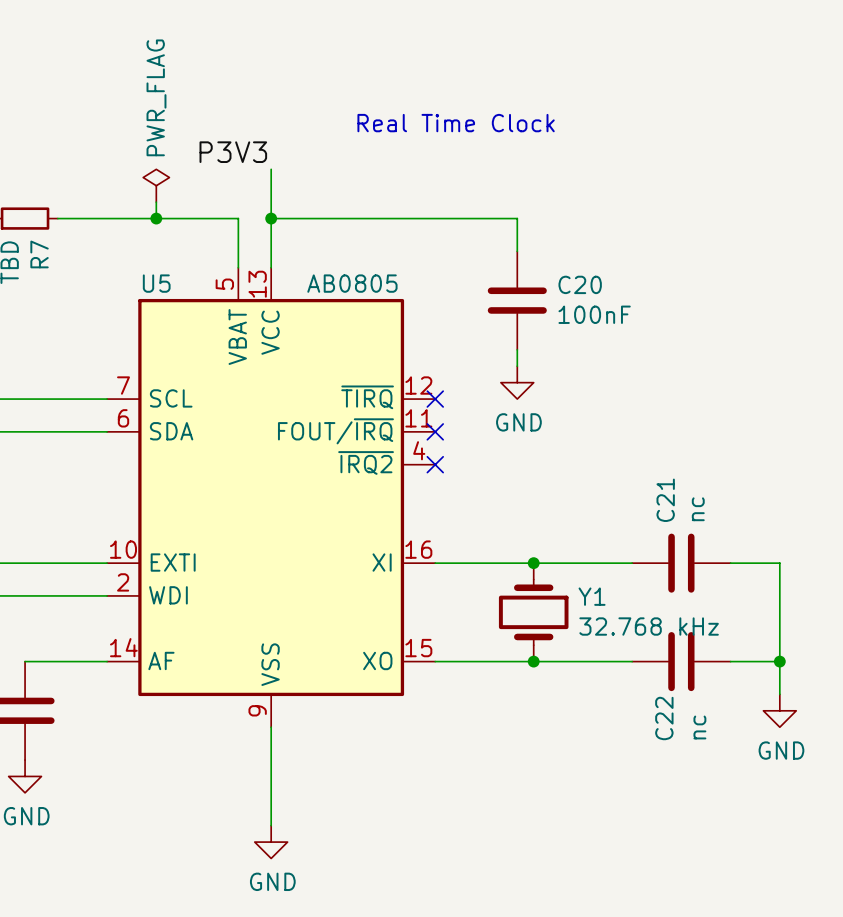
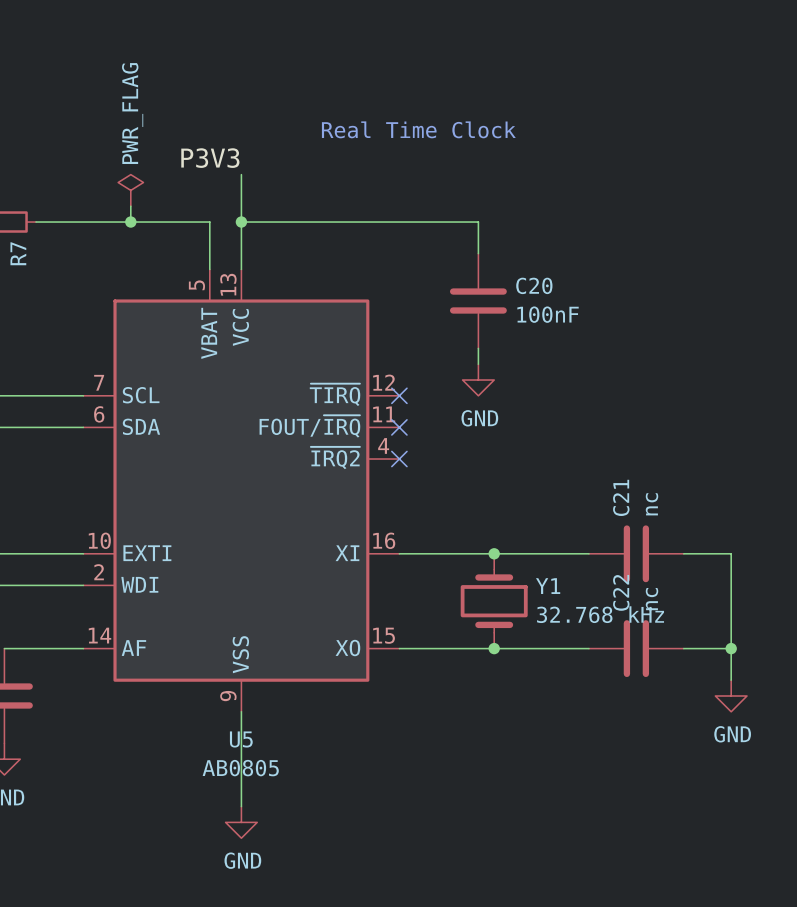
U5 name position: U5 (156, 283) -> U5 (241, 739)
U5 value position: AB0805 (352, 283) -> AB0805 (240, 768)
C22 name position: C22 (664, 718) -> C22 (621, 592)
C22 value position: nc (699, 727) -> nc (652, 599)

